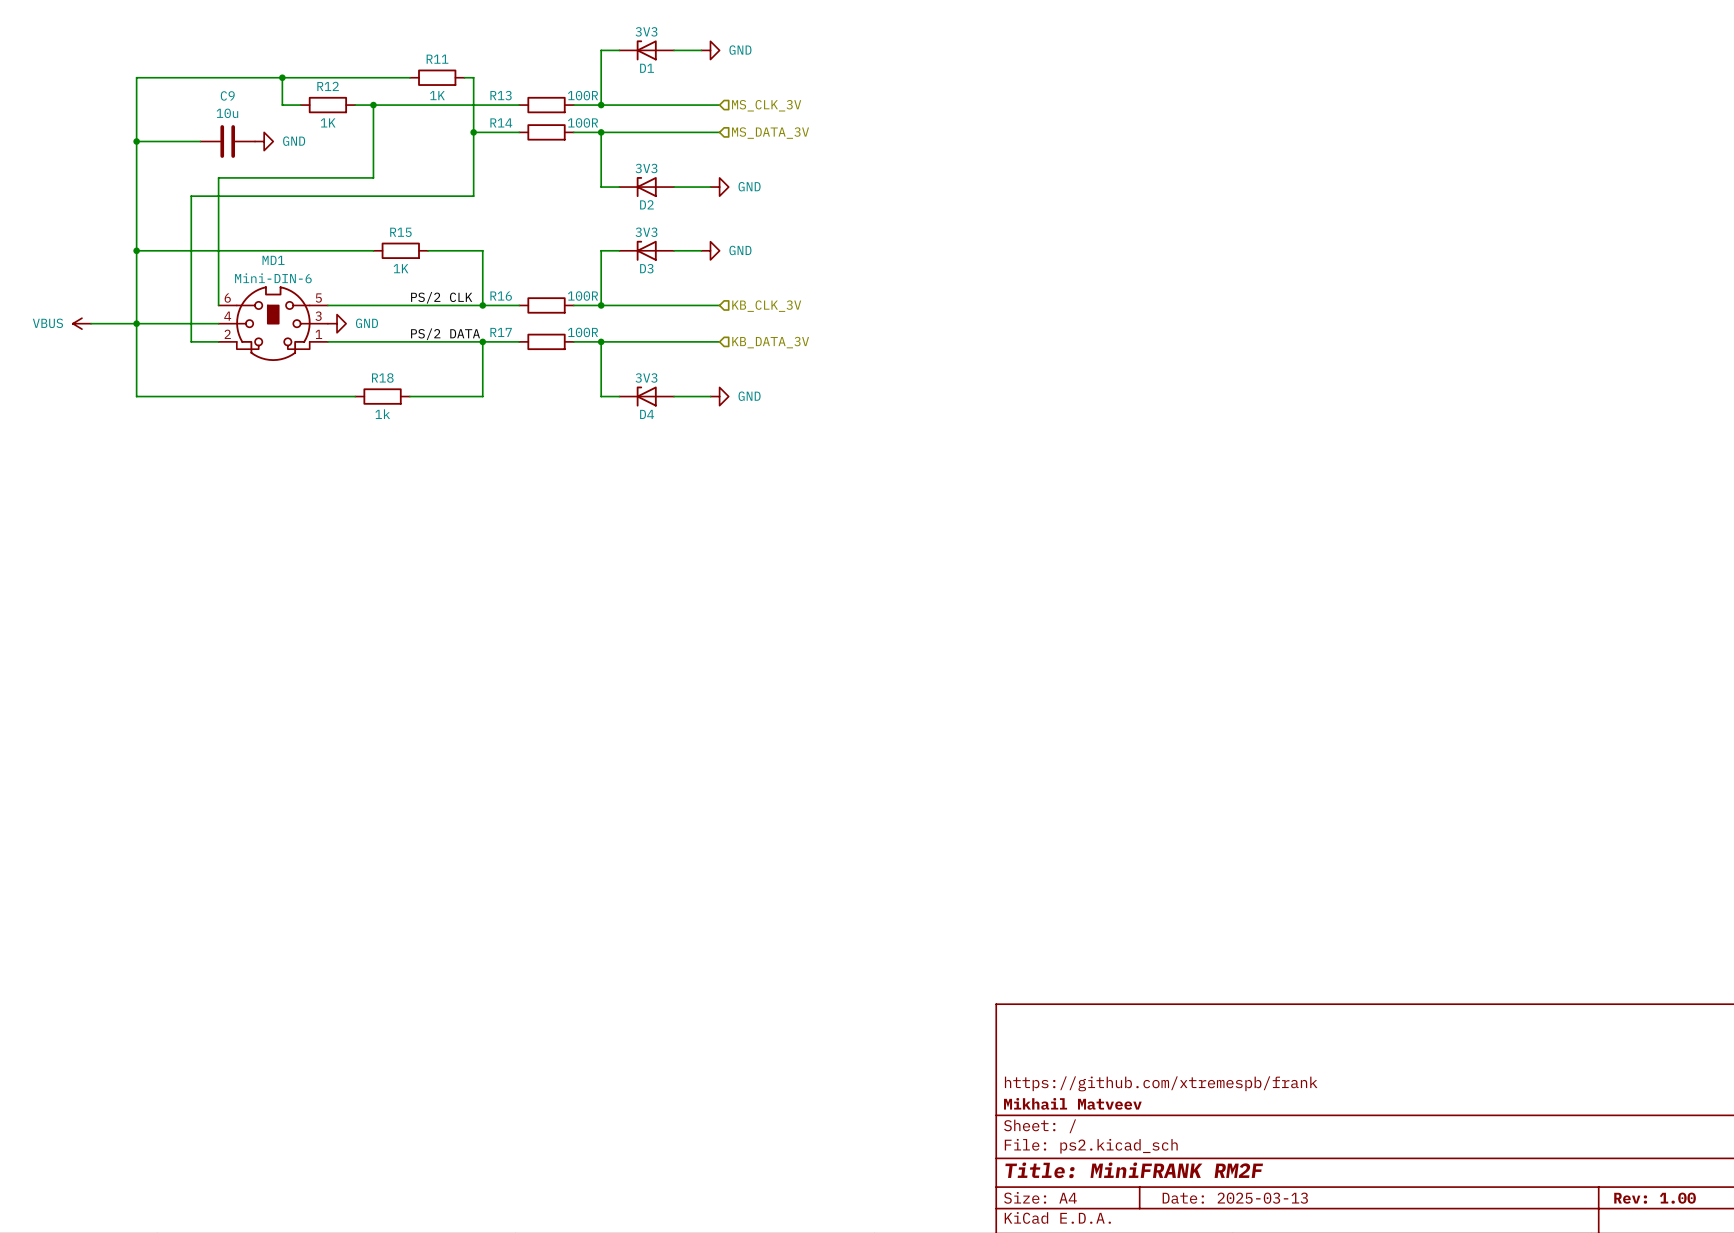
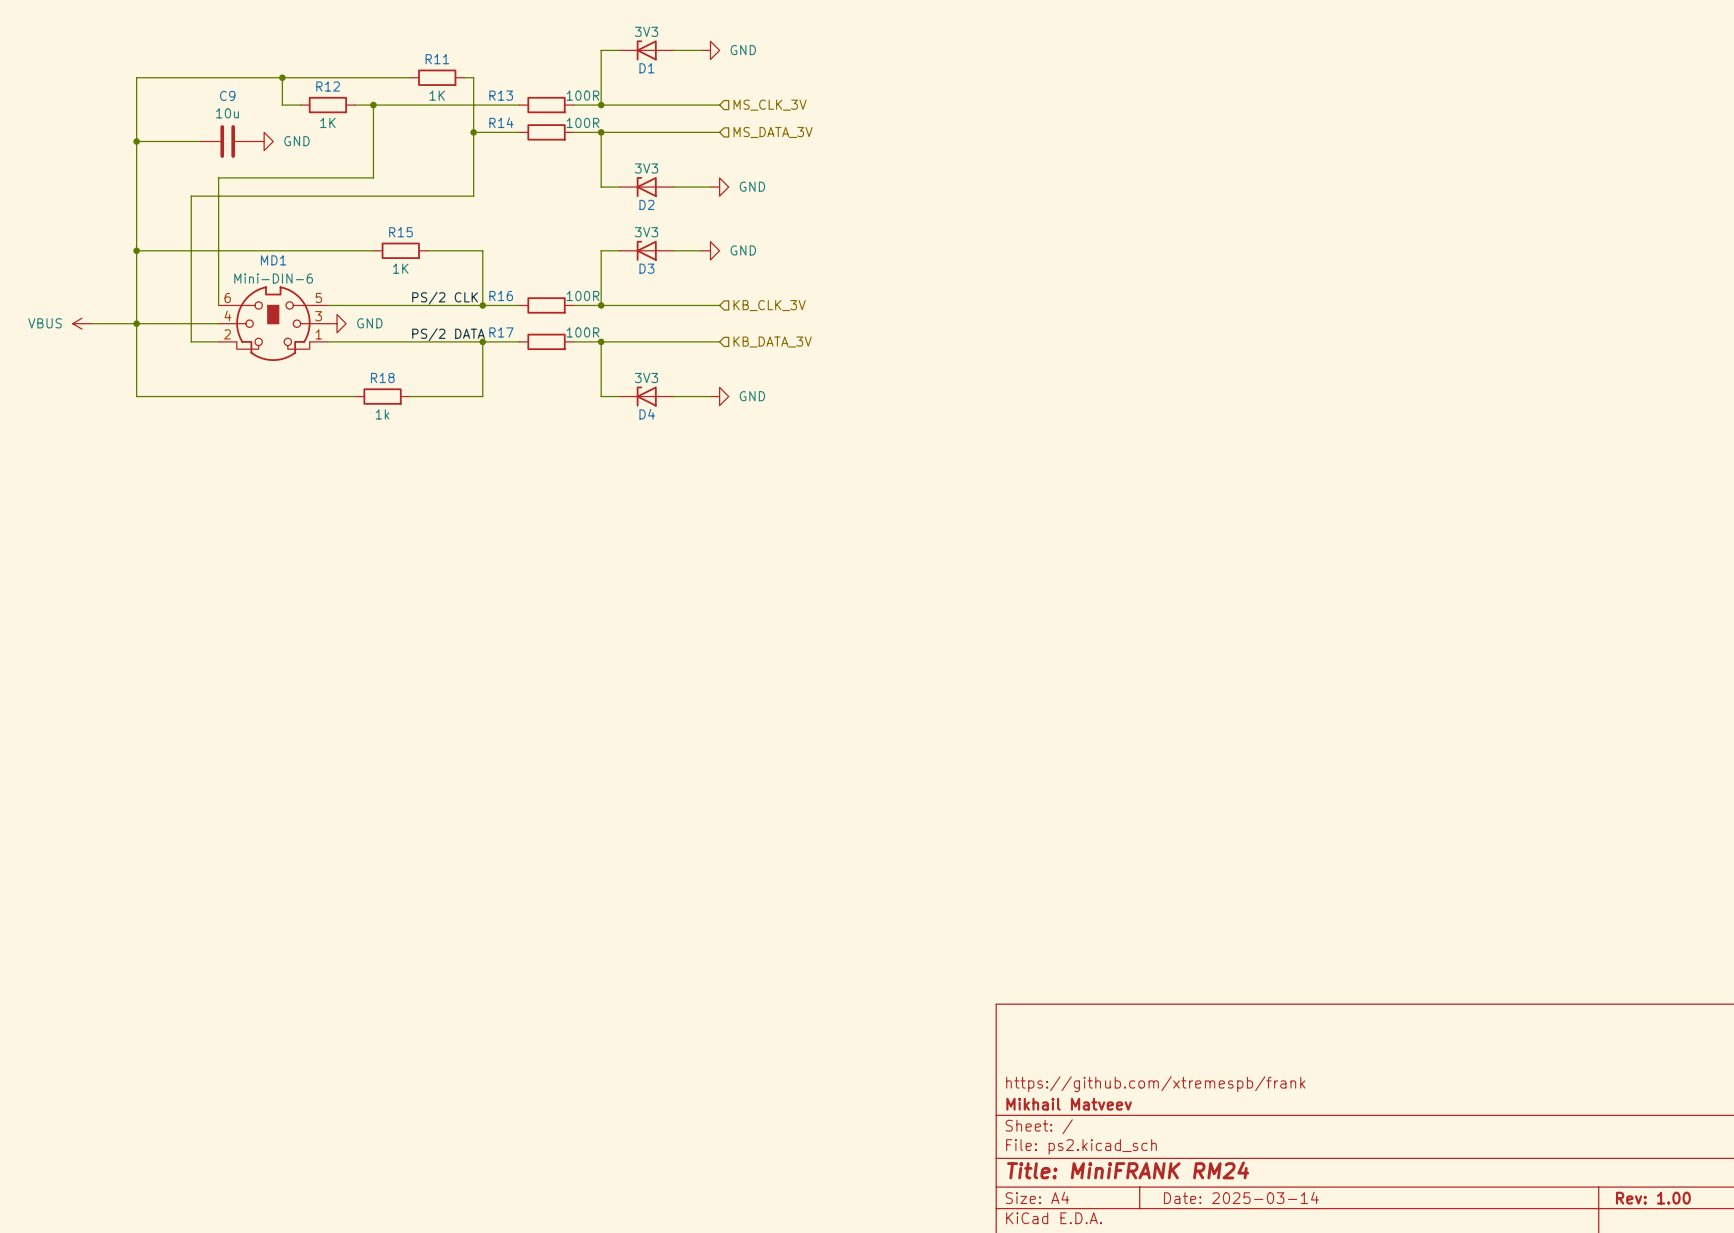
title block: Title: MiniFRANK RM2F (1134, 1170) -> Title: MiniFRANK RM24 (1128, 1170)
title block: Date: 2025-03-13 (1235, 1198) -> Date: 2025-03-14 (1241, 1197)

